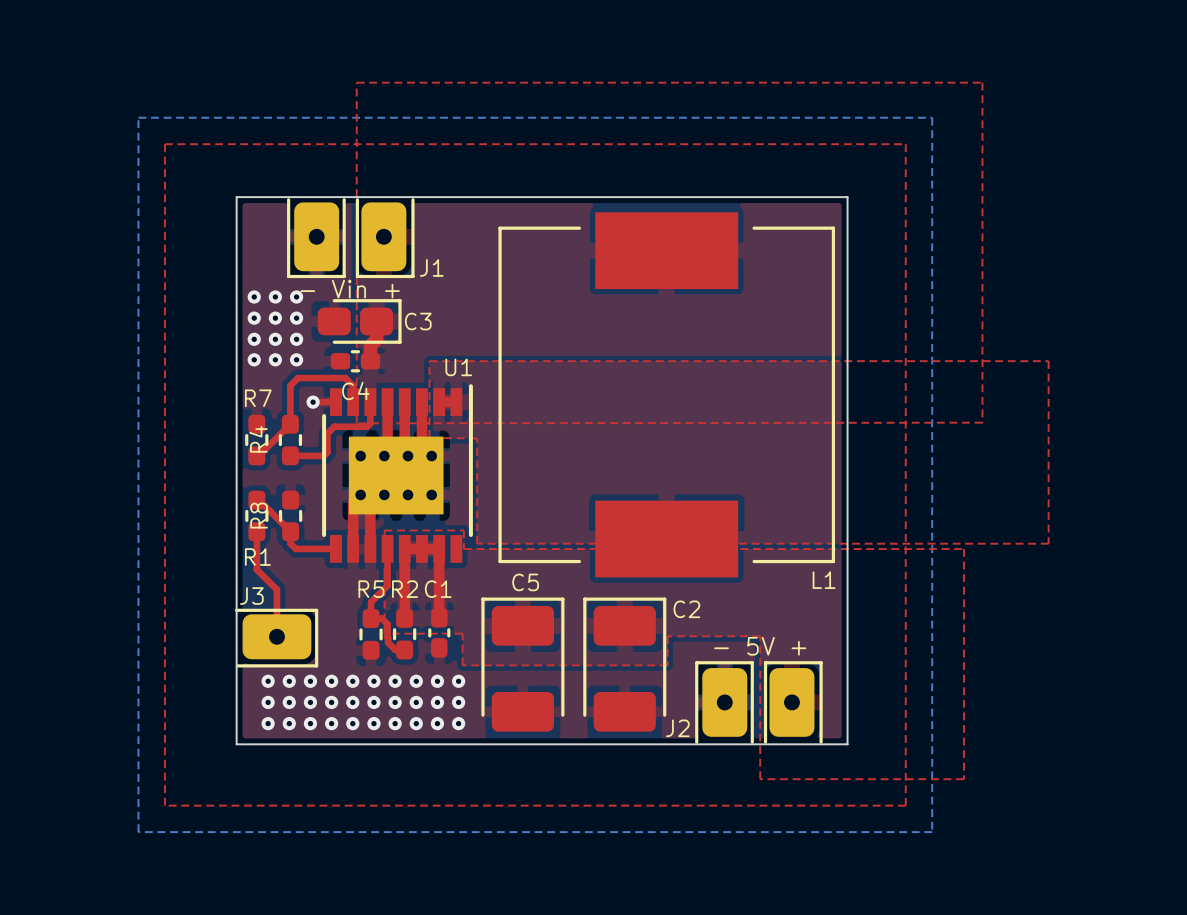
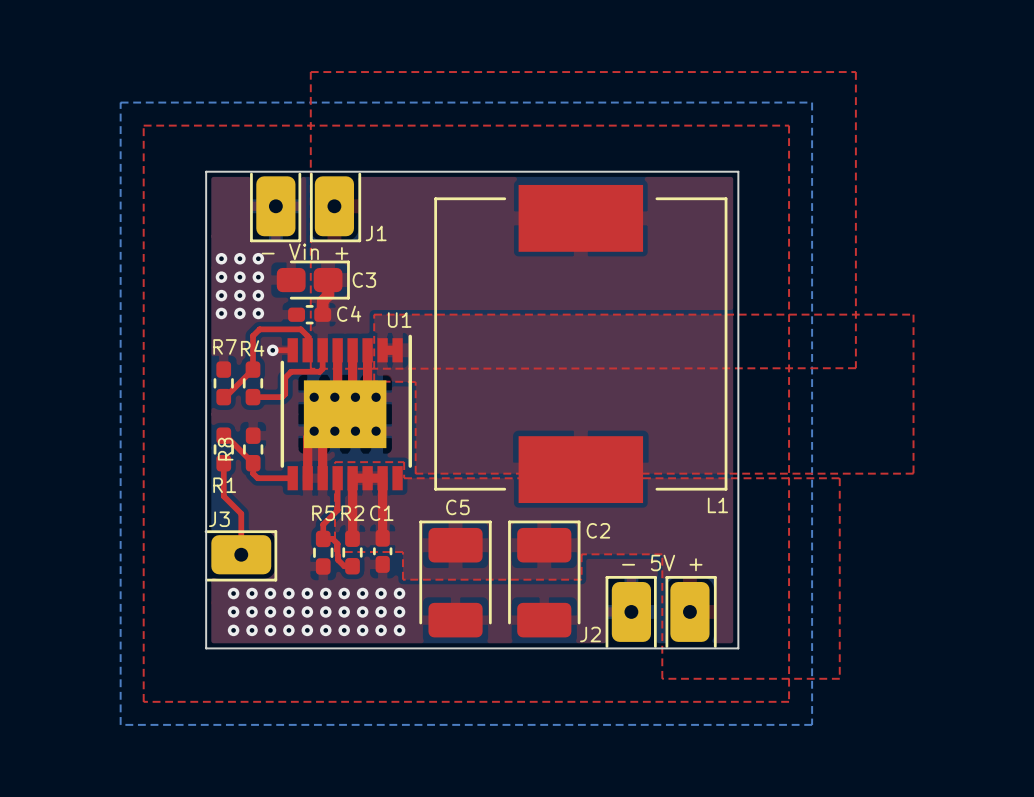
C4 name position: C4 (355, 390) -> C4 (349, 313)
R4 name rotation: 0° (258, 439) -> 90° clockwise (252, 348)
R4 name position: R4 (258, 439) -> R4 (252, 348)

